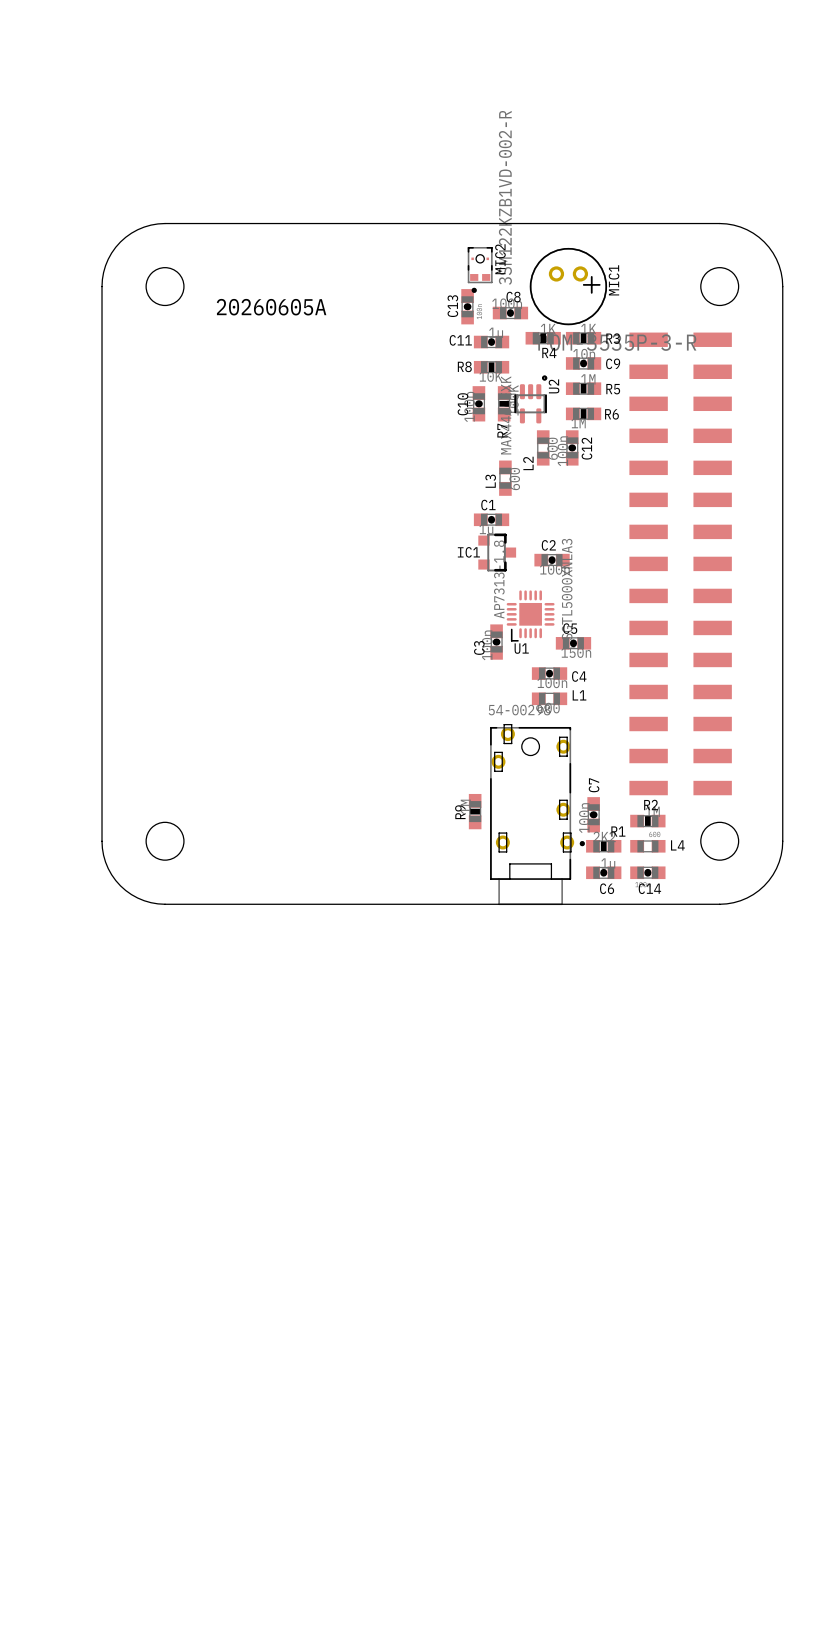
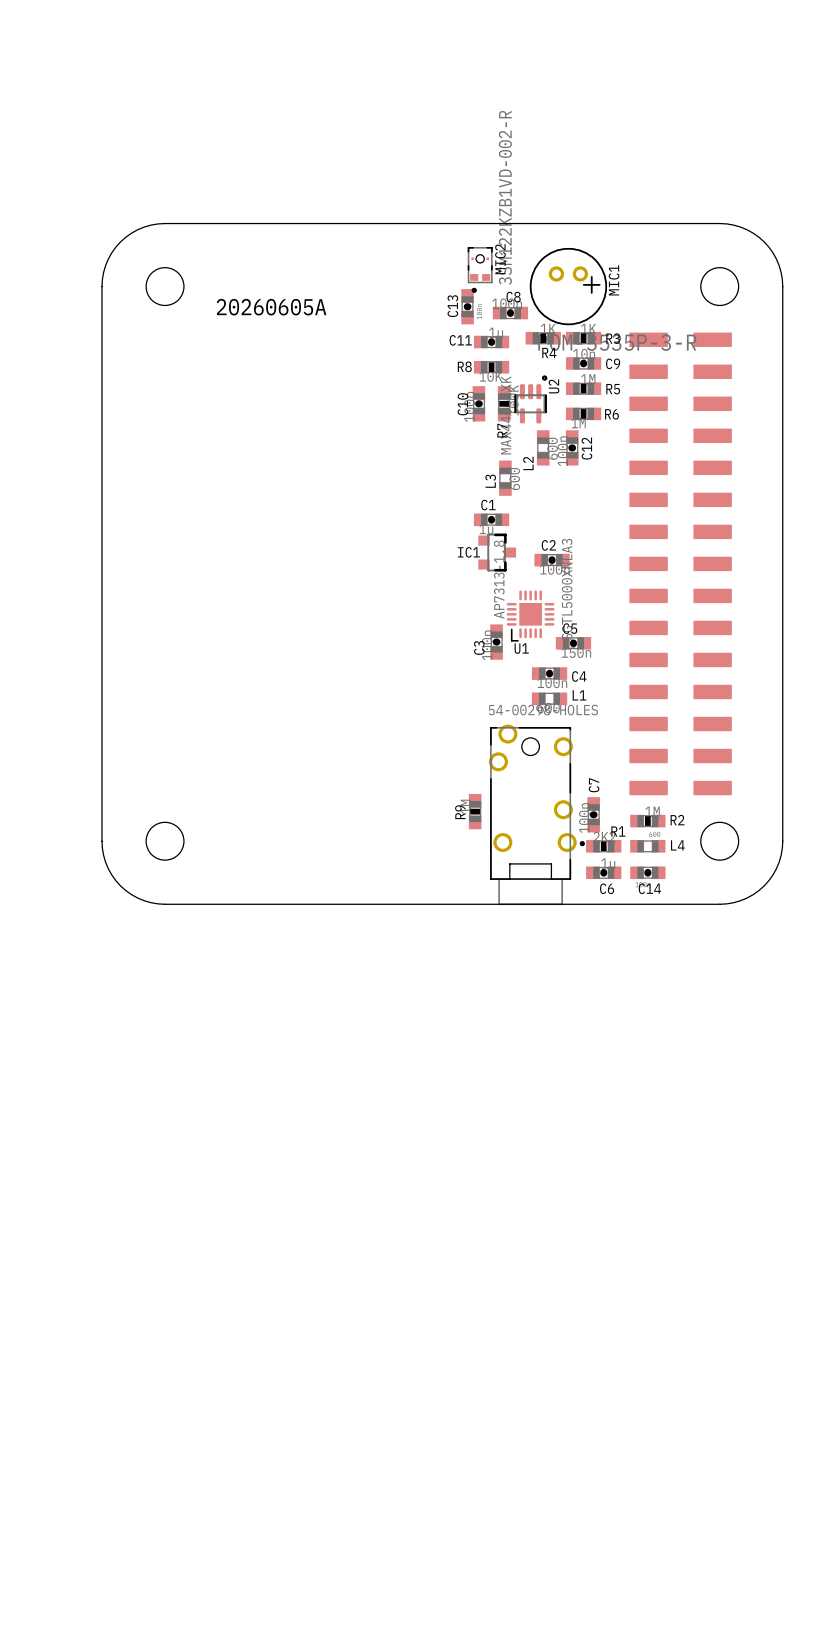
part value: 54-00298 (519, 710) -> 54-00298-HOLES (543, 710)
part footprint: [490, 724, 585, 906] -> [488, 724, 585, 906]
R2 name position: R2 (651, 804) -> R2 (677, 820)

